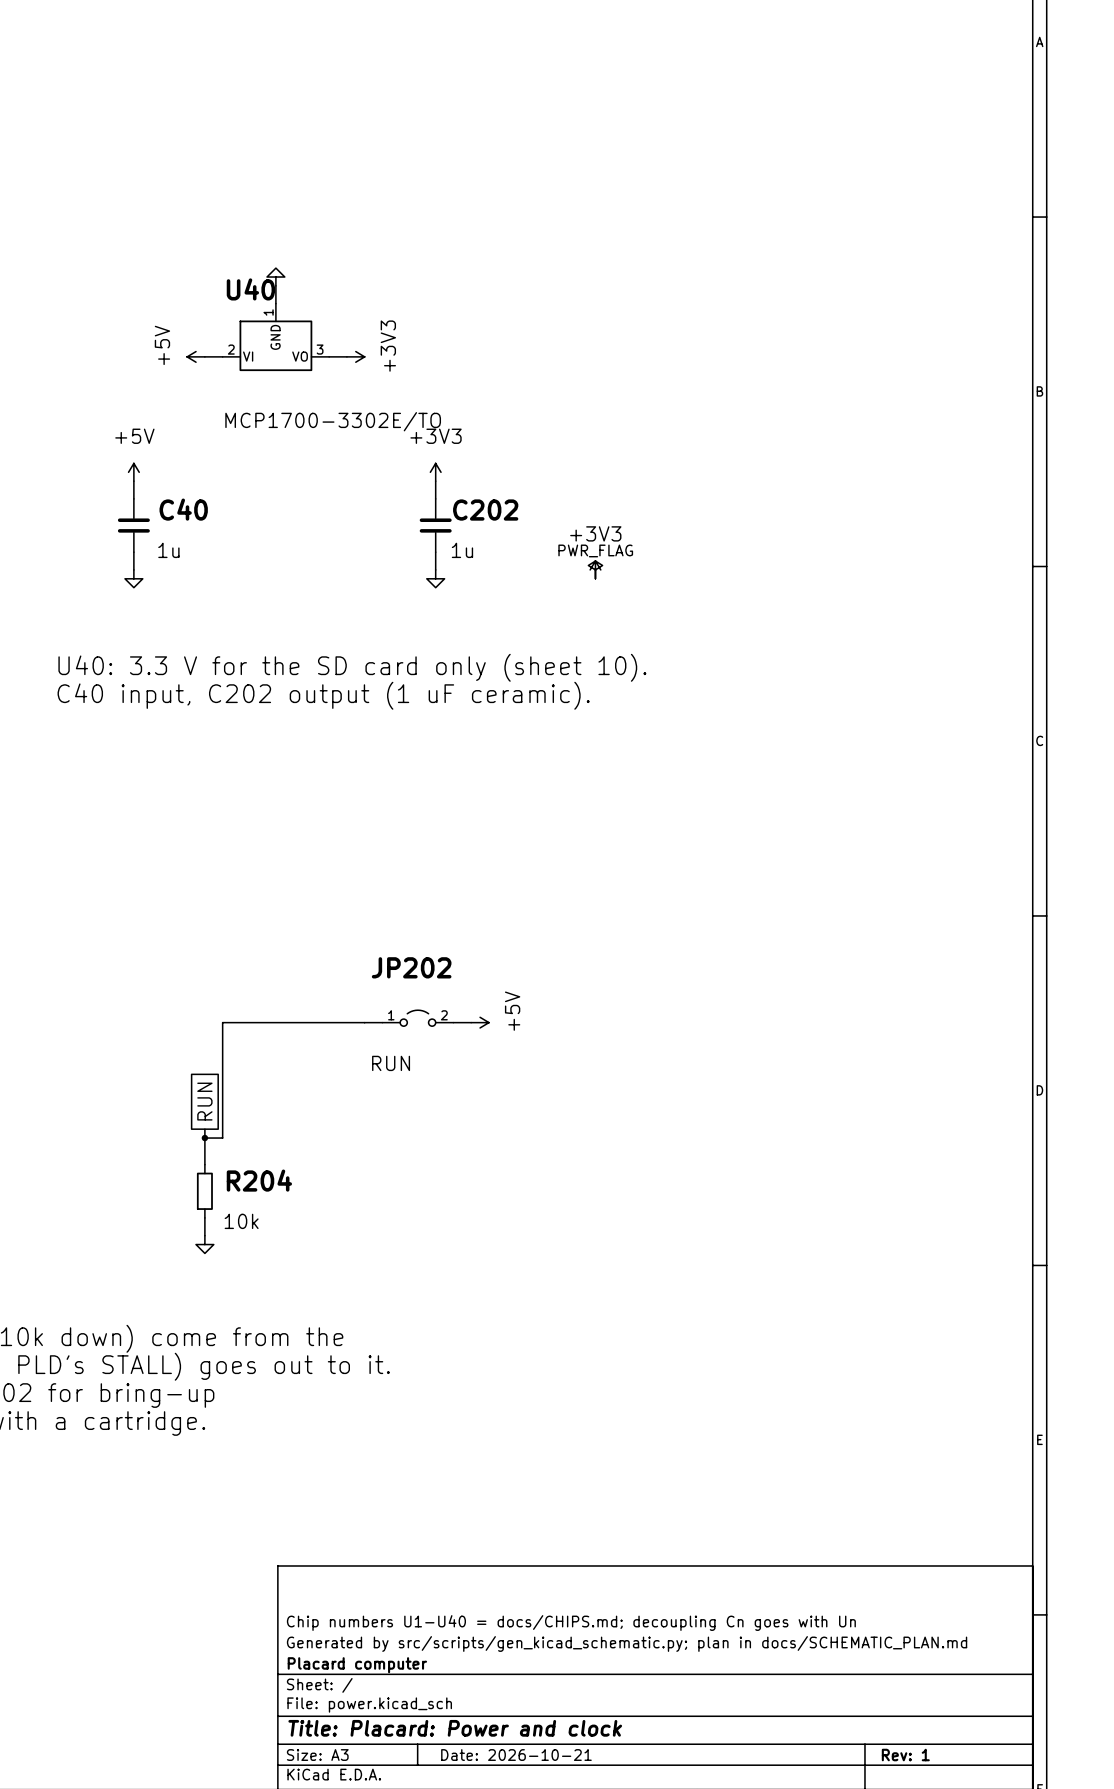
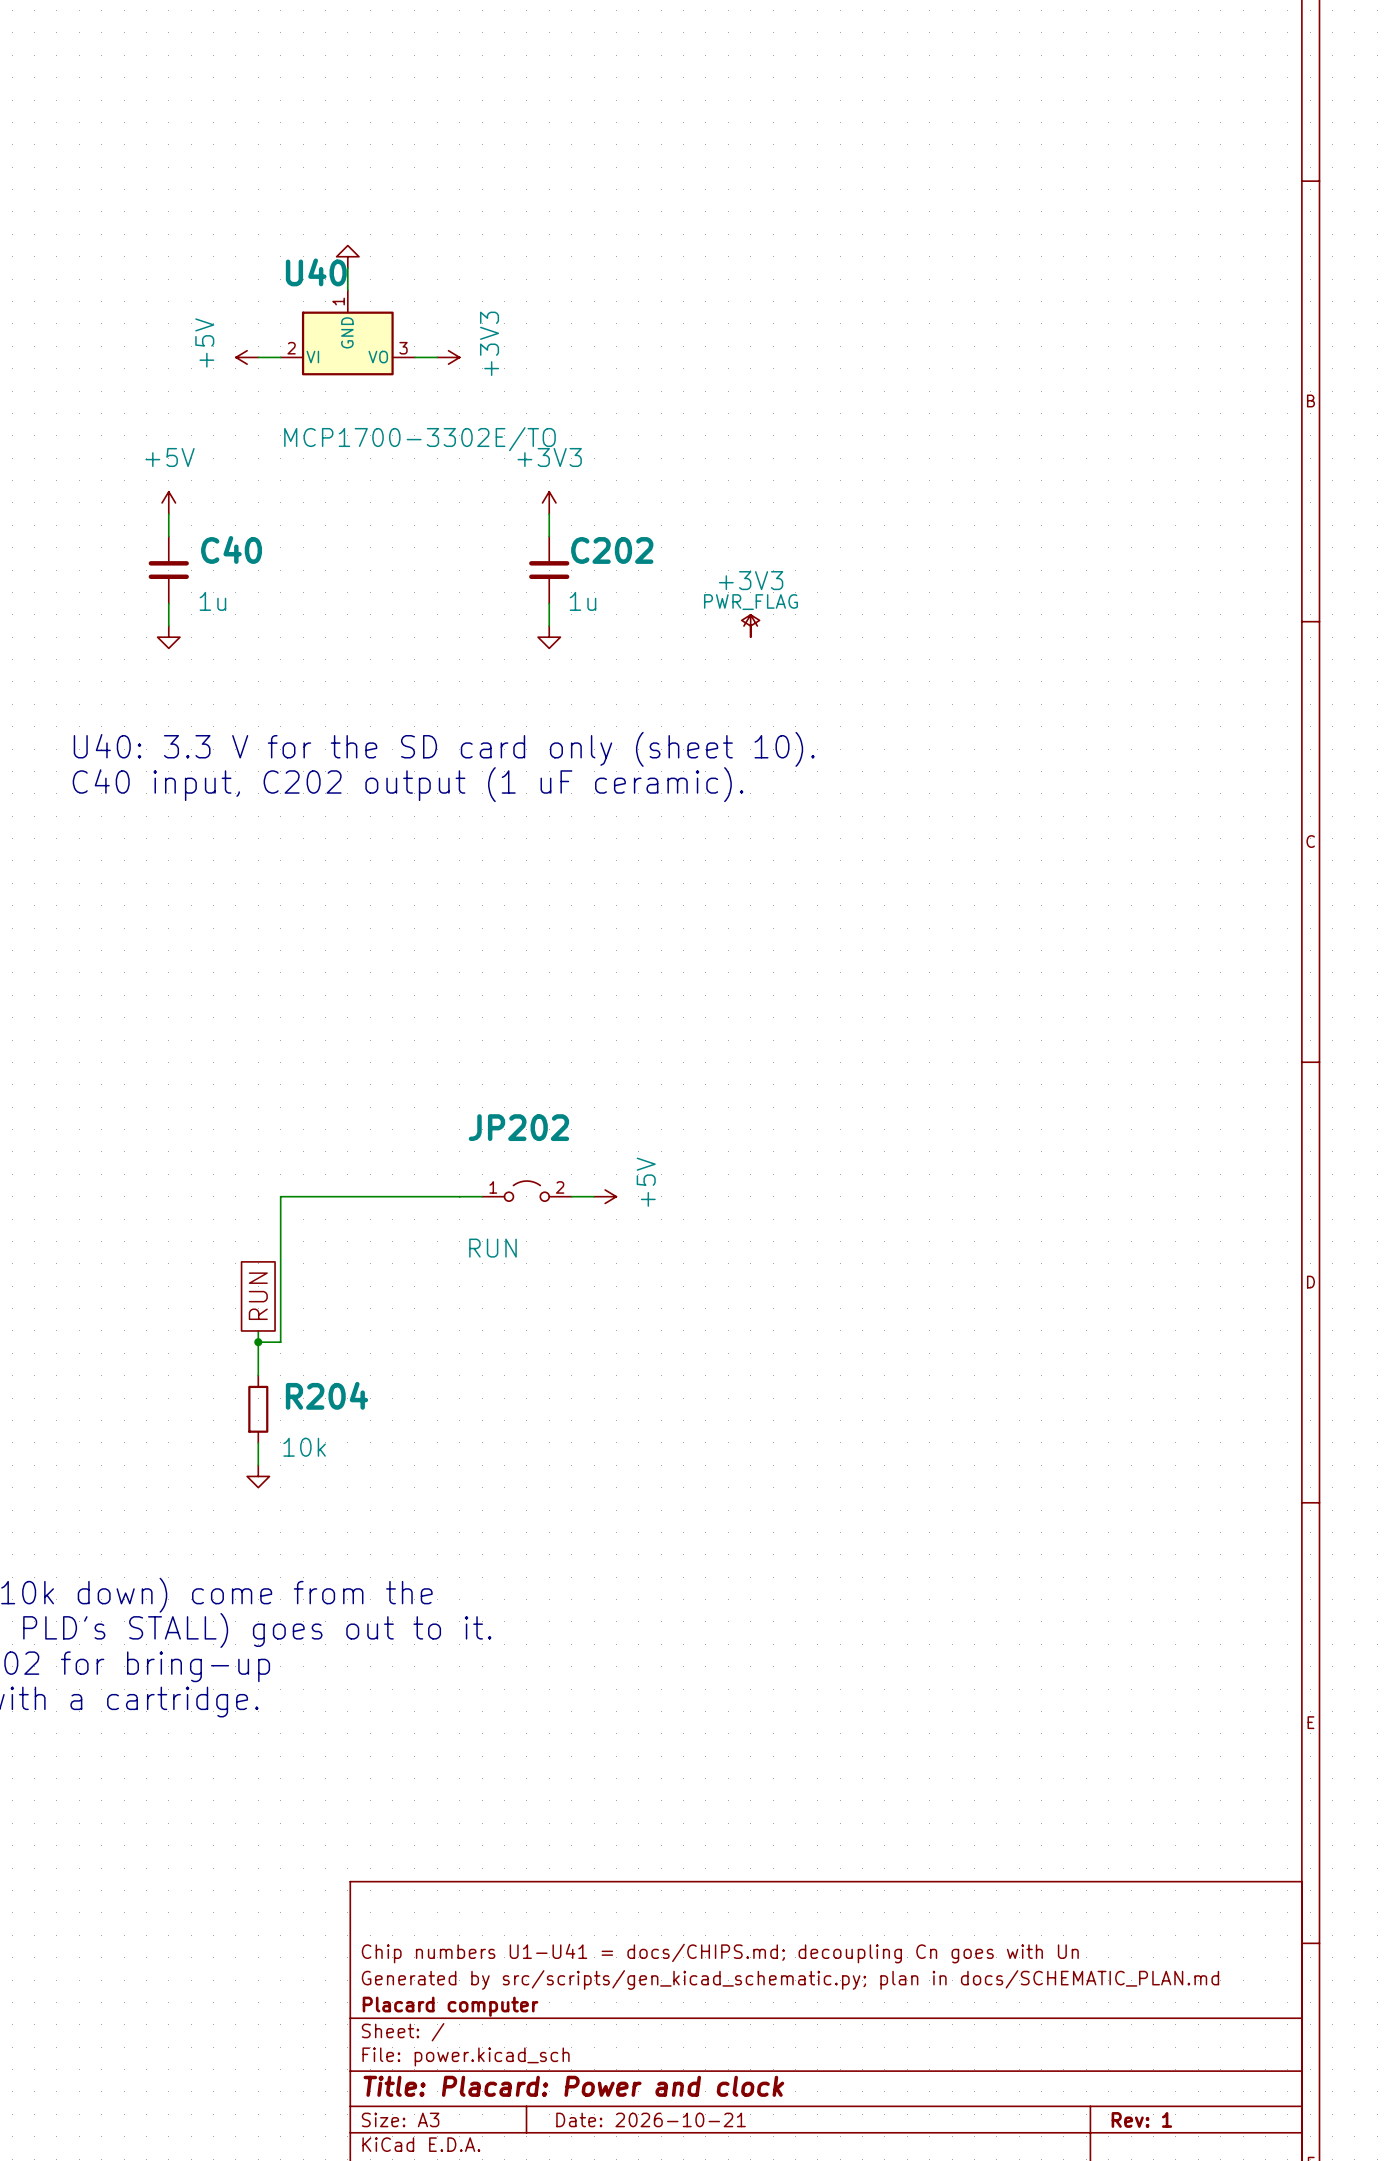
title block: Chip numbers U1-U40 = docs/CHIPS.md; decoupling Cn goes with Un (571, 1623) -> Chip numbers U1-U41 = docs/CHIPS.md; decoupling Cn goes with Un (720, 1953)

